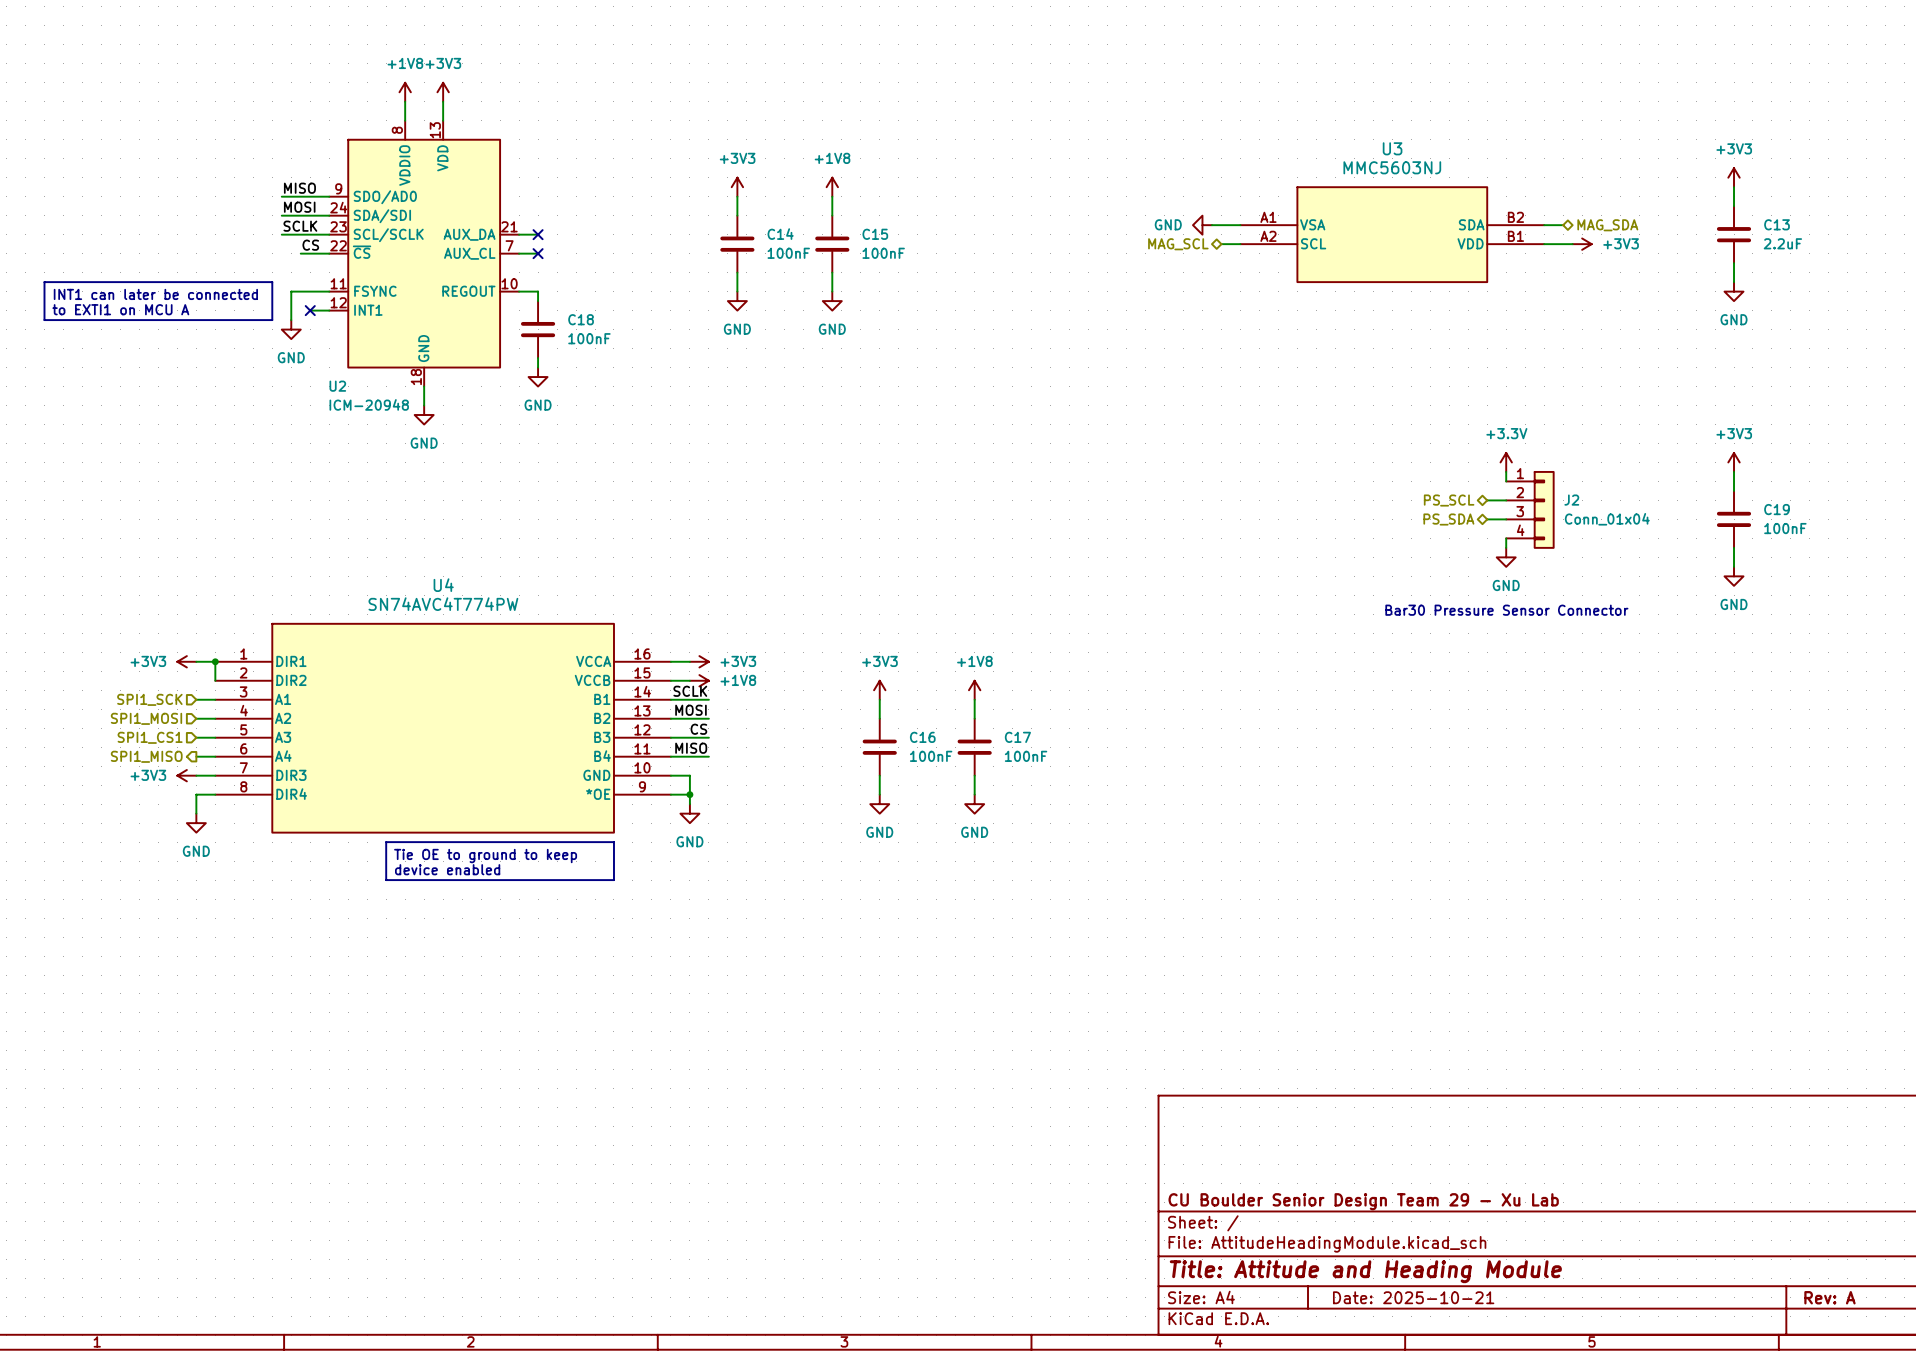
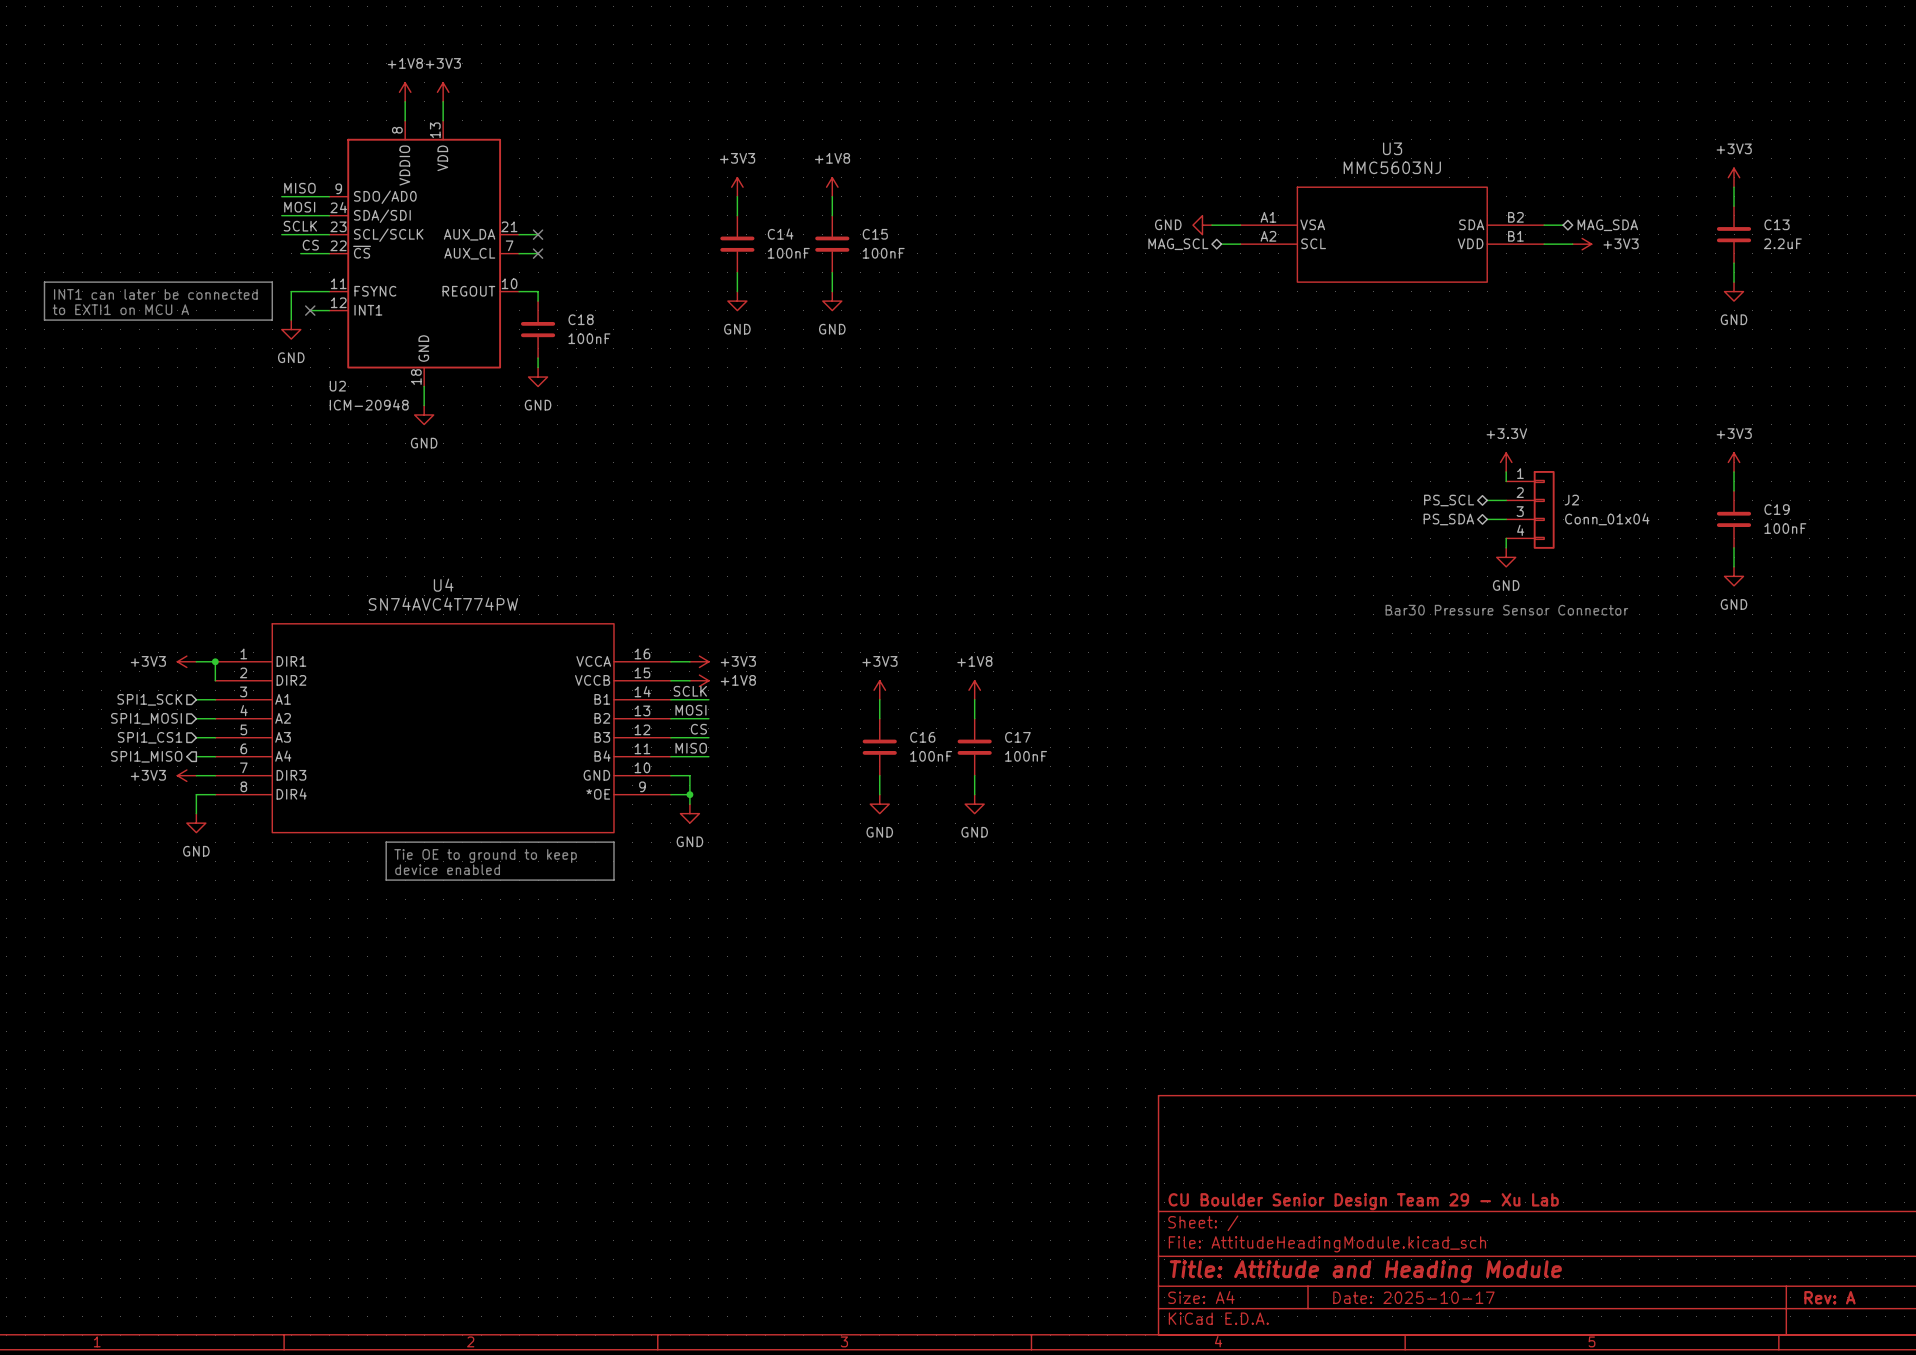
title block: Date: 2025-10-21 (1413, 1297) -> Date: 2025-10-17 (1413, 1297)

